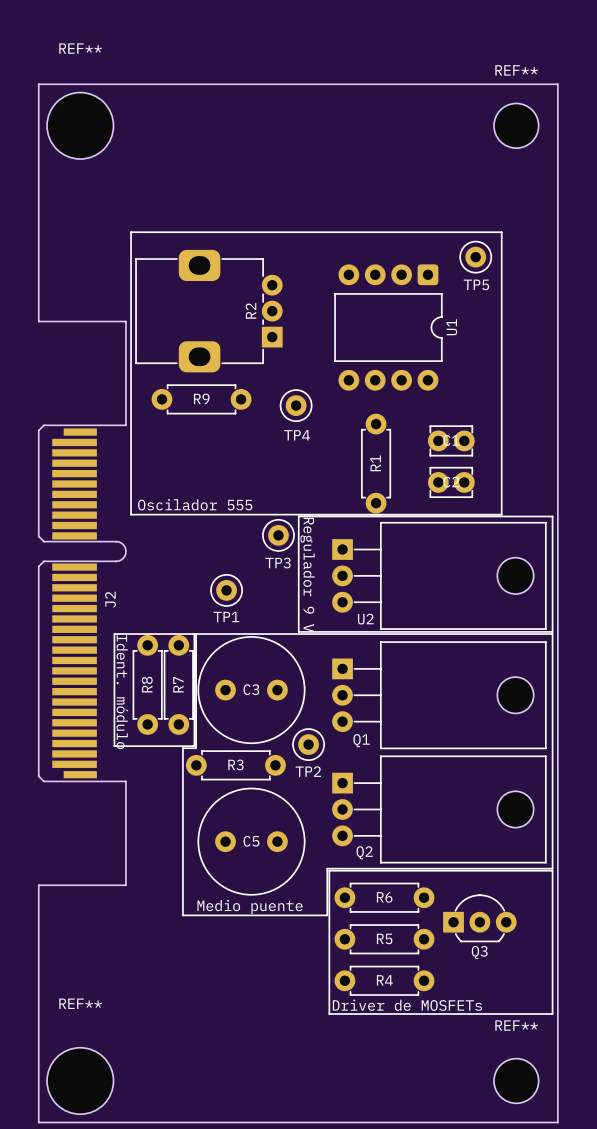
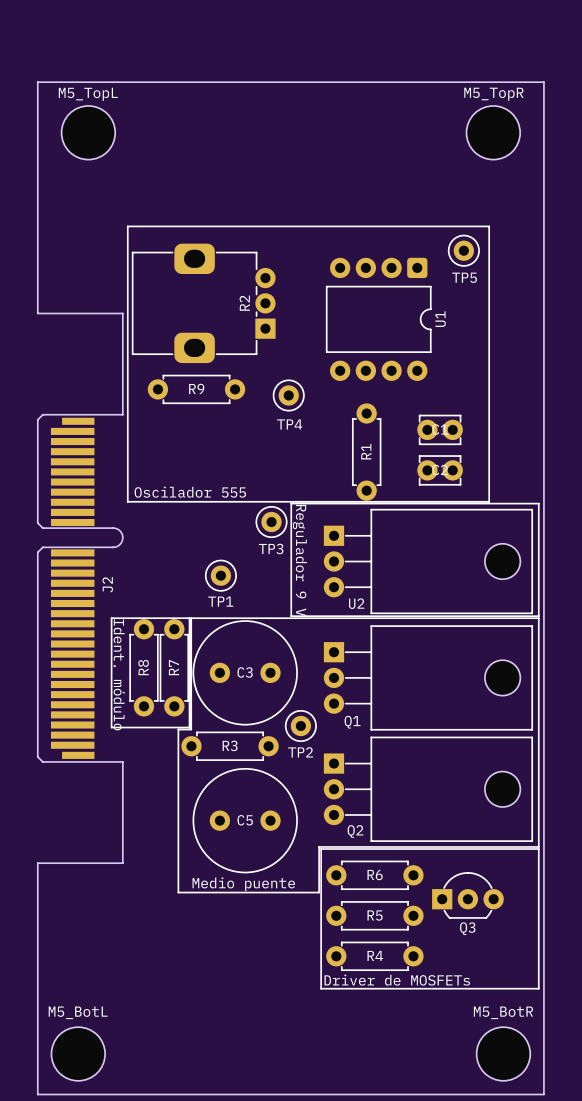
REF**: (80, 125) -> none
REF**: (516, 125) -> none
M5_TopL: none -> (88, 132)
M5_TopR: none -> (493, 132)
REF**: (80, 1080) -> none
M5_BotL: none -> (78, 1054)
REF**: (516, 1080) -> none
M5_BotR: none -> (503, 1054)

